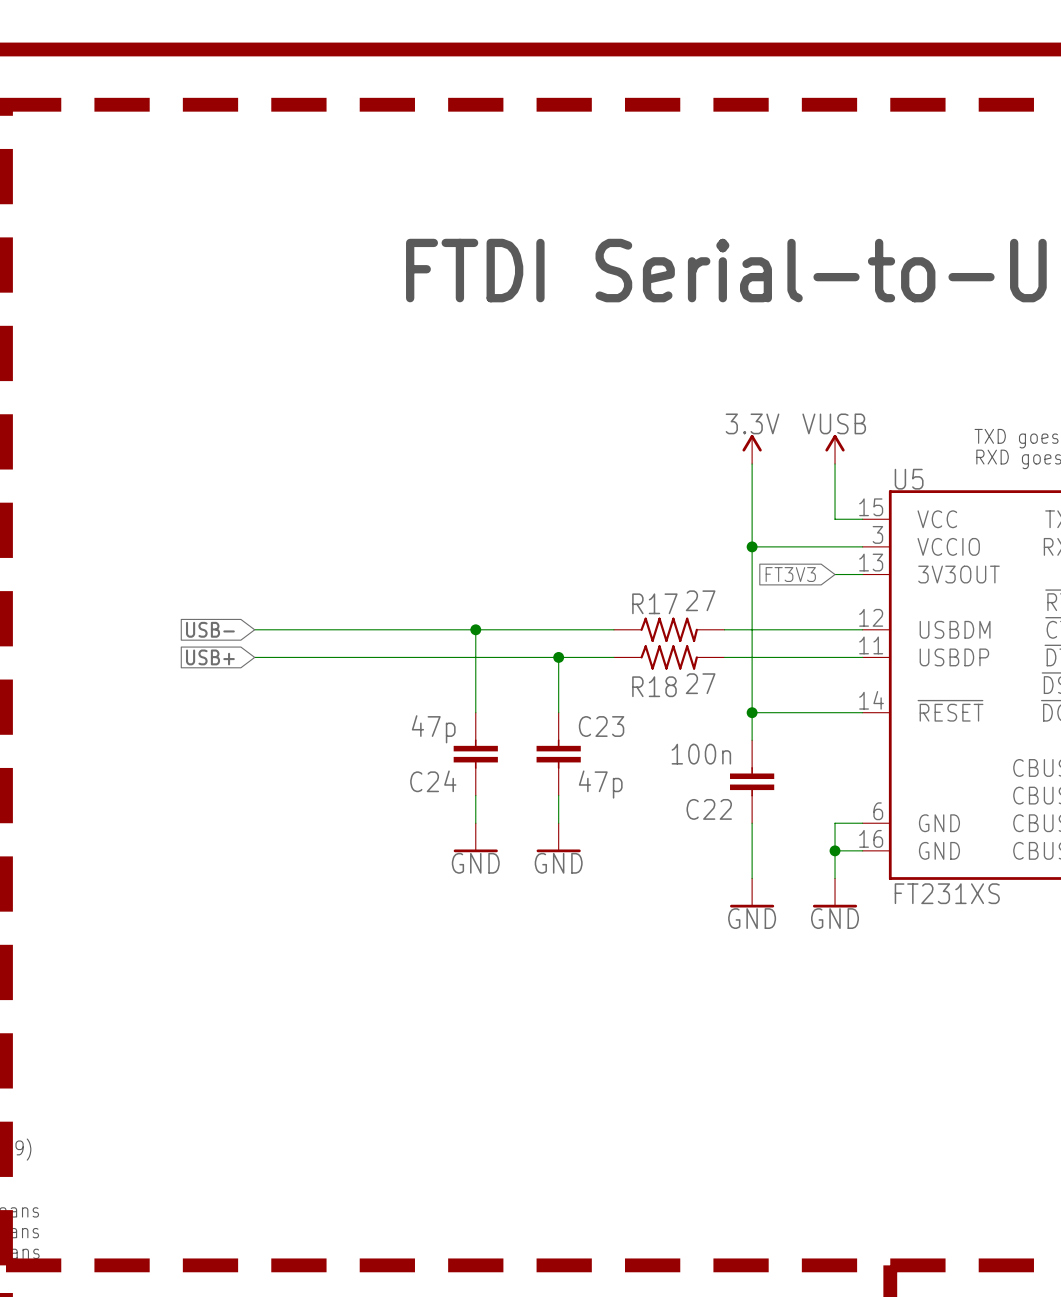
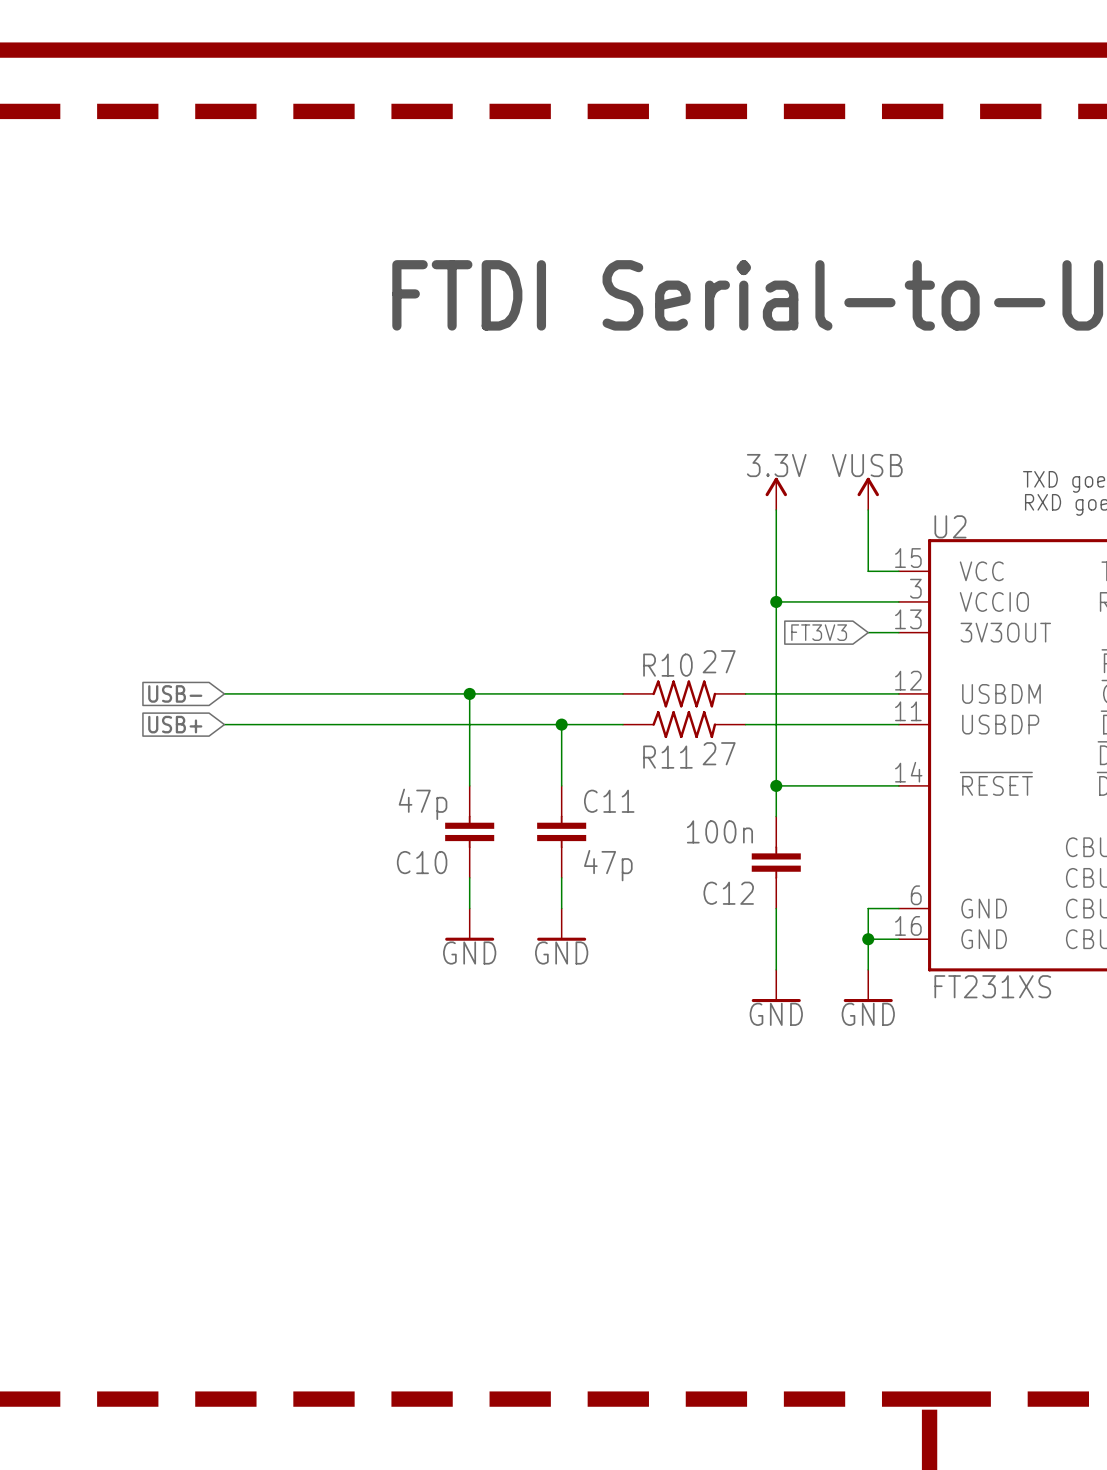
U5 name: U5 (909, 479) -> U2 (950, 526)
R17 name: R17 (654, 603) -> R10 (667, 665)
R18 name: R18 (654, 686) -> R11 (667, 757)
C23 name: C23 (601, 726) -> C11 (609, 801)
C24 name: C24 (433, 781) -> C10 (422, 862)
C22 name: C22 (709, 809) -> C12 (728, 893)

